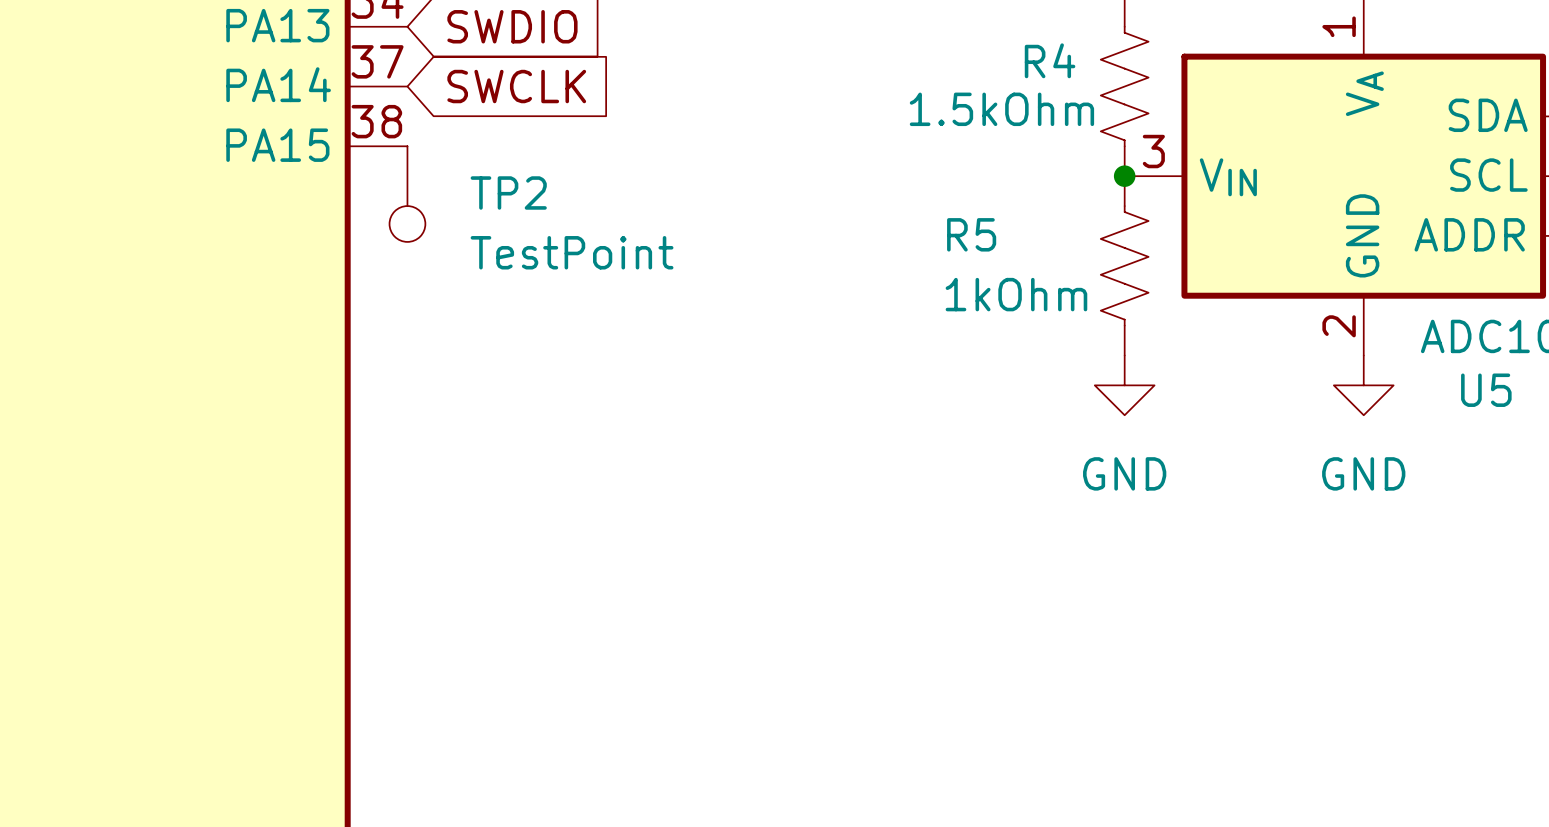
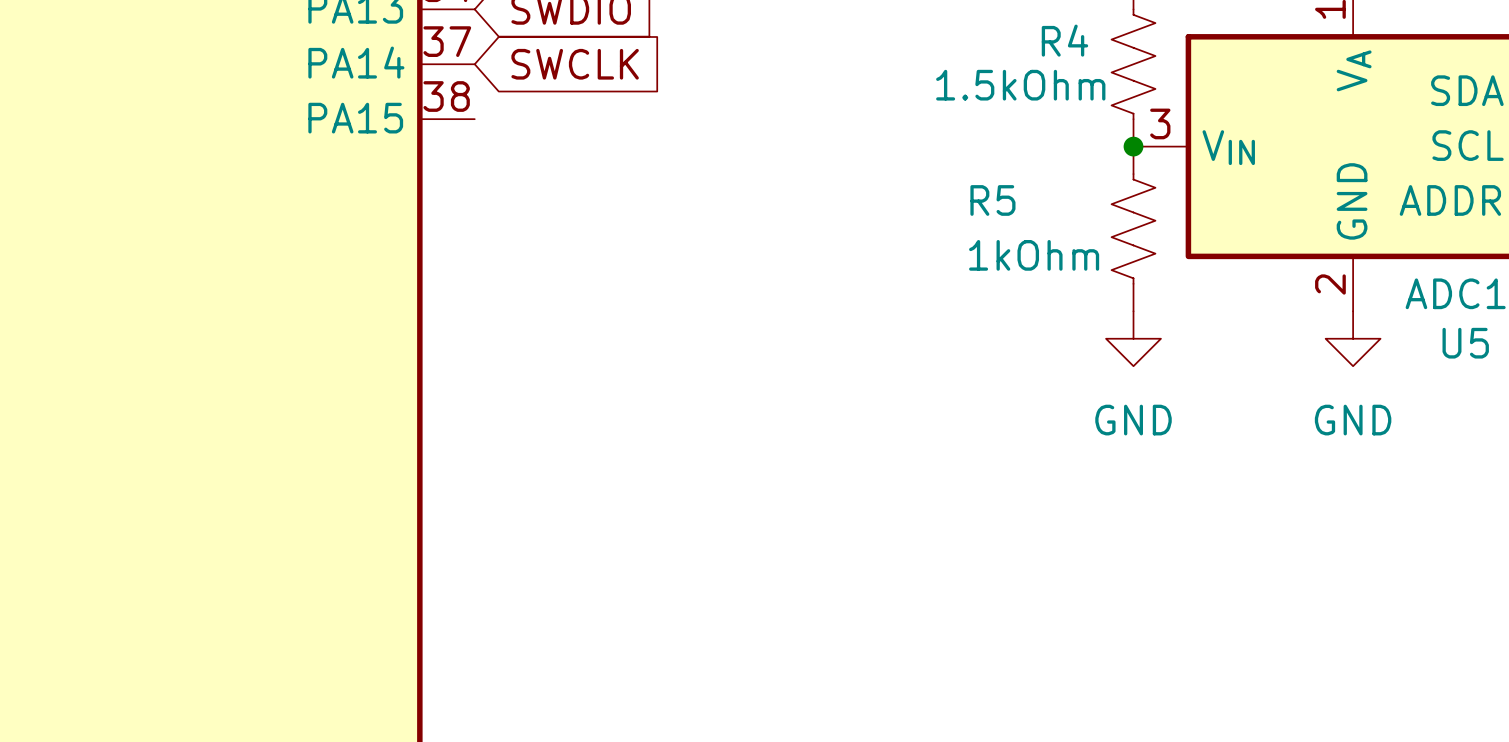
TP2: TestPoint (407, 194) -> none

